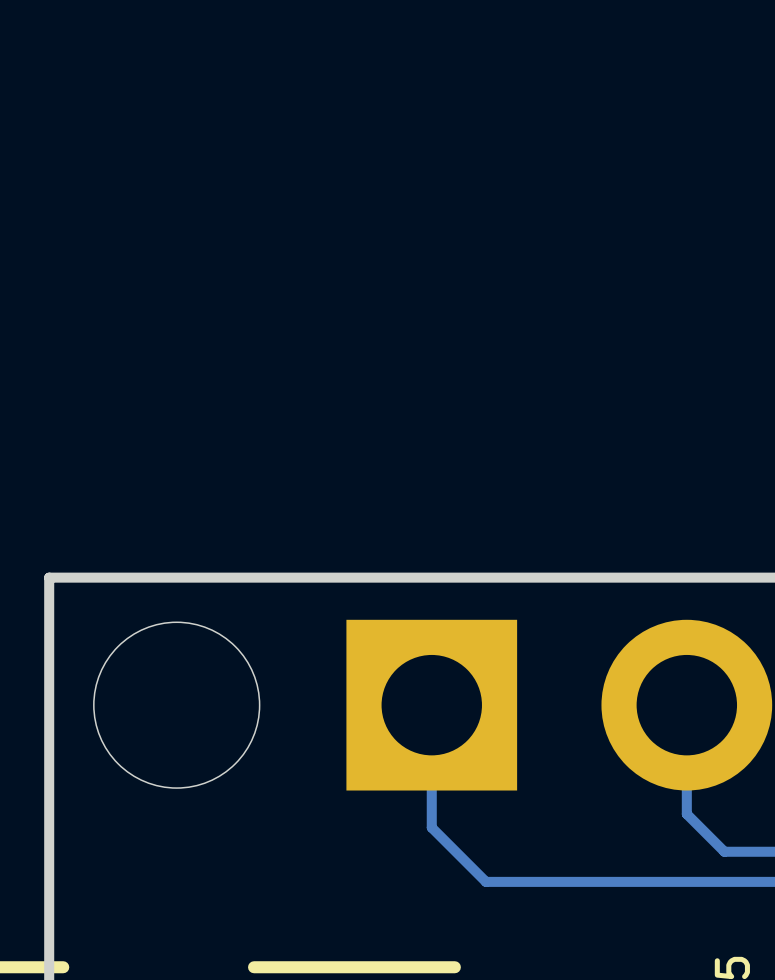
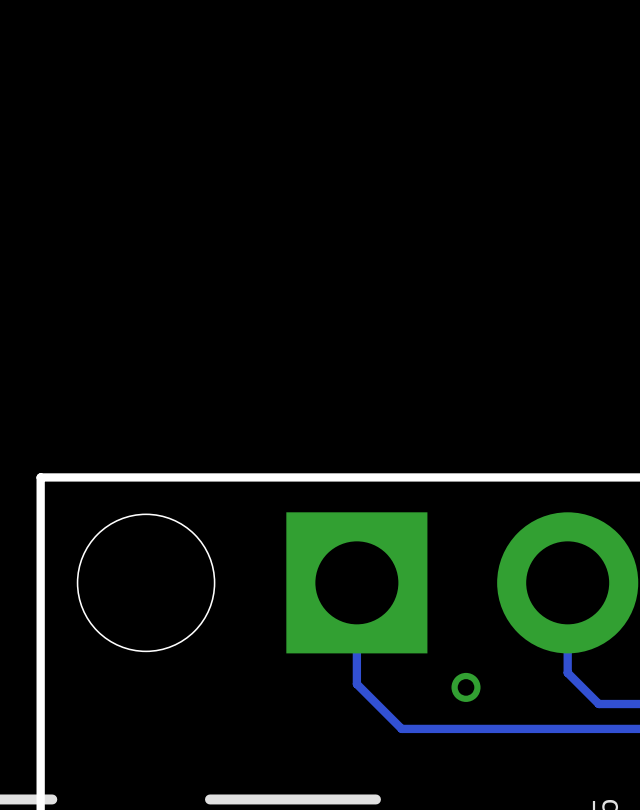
via: none -> (466, 687)

